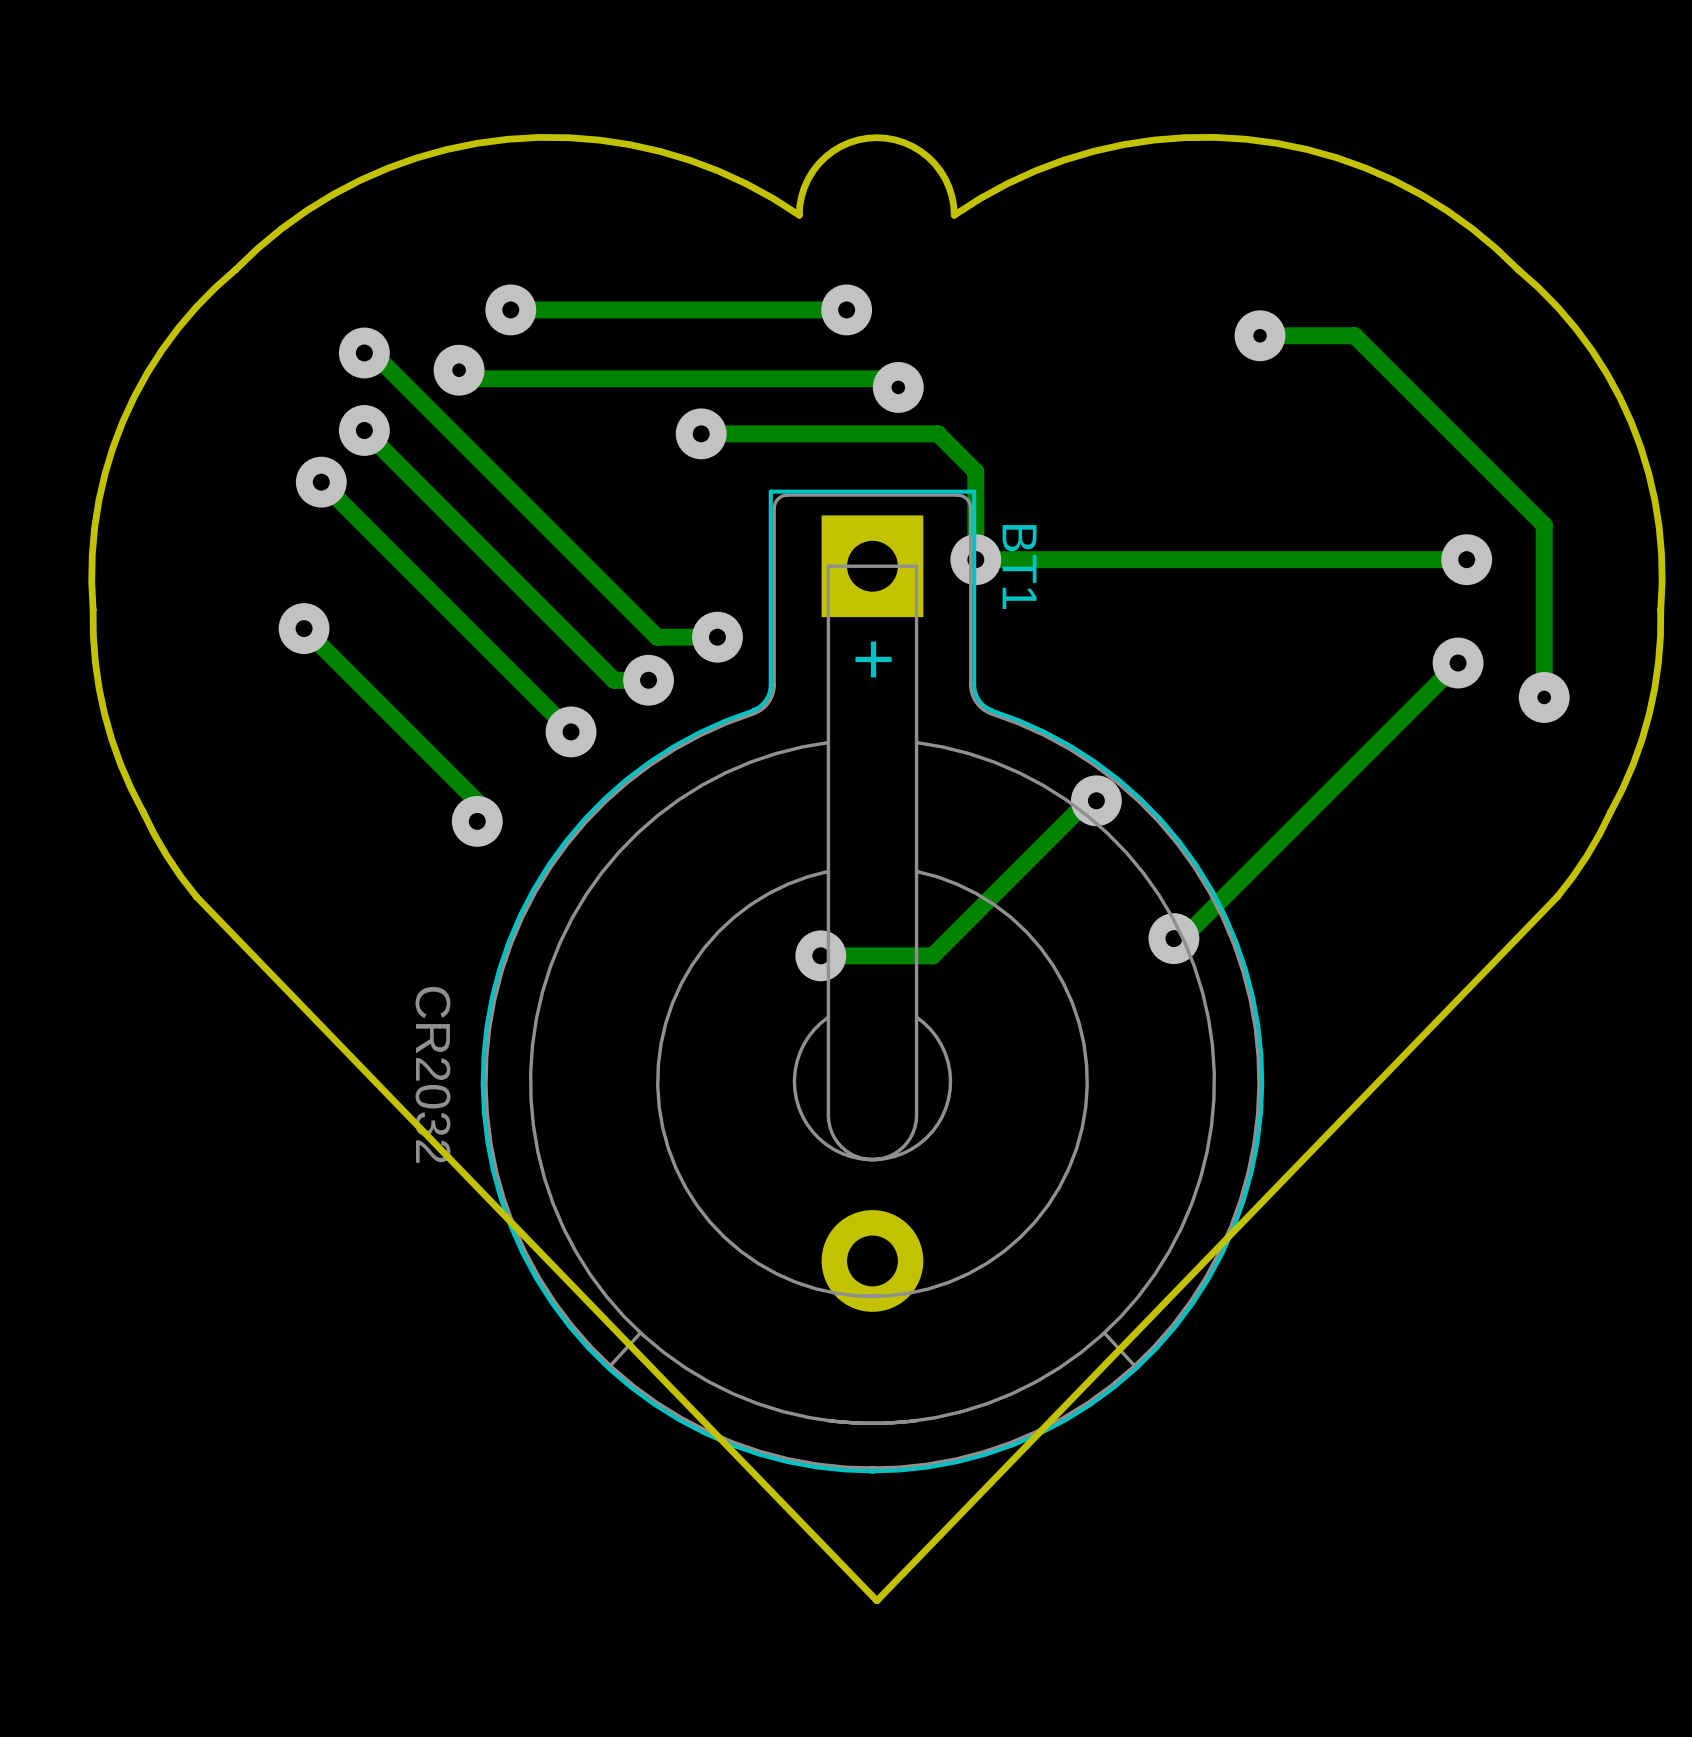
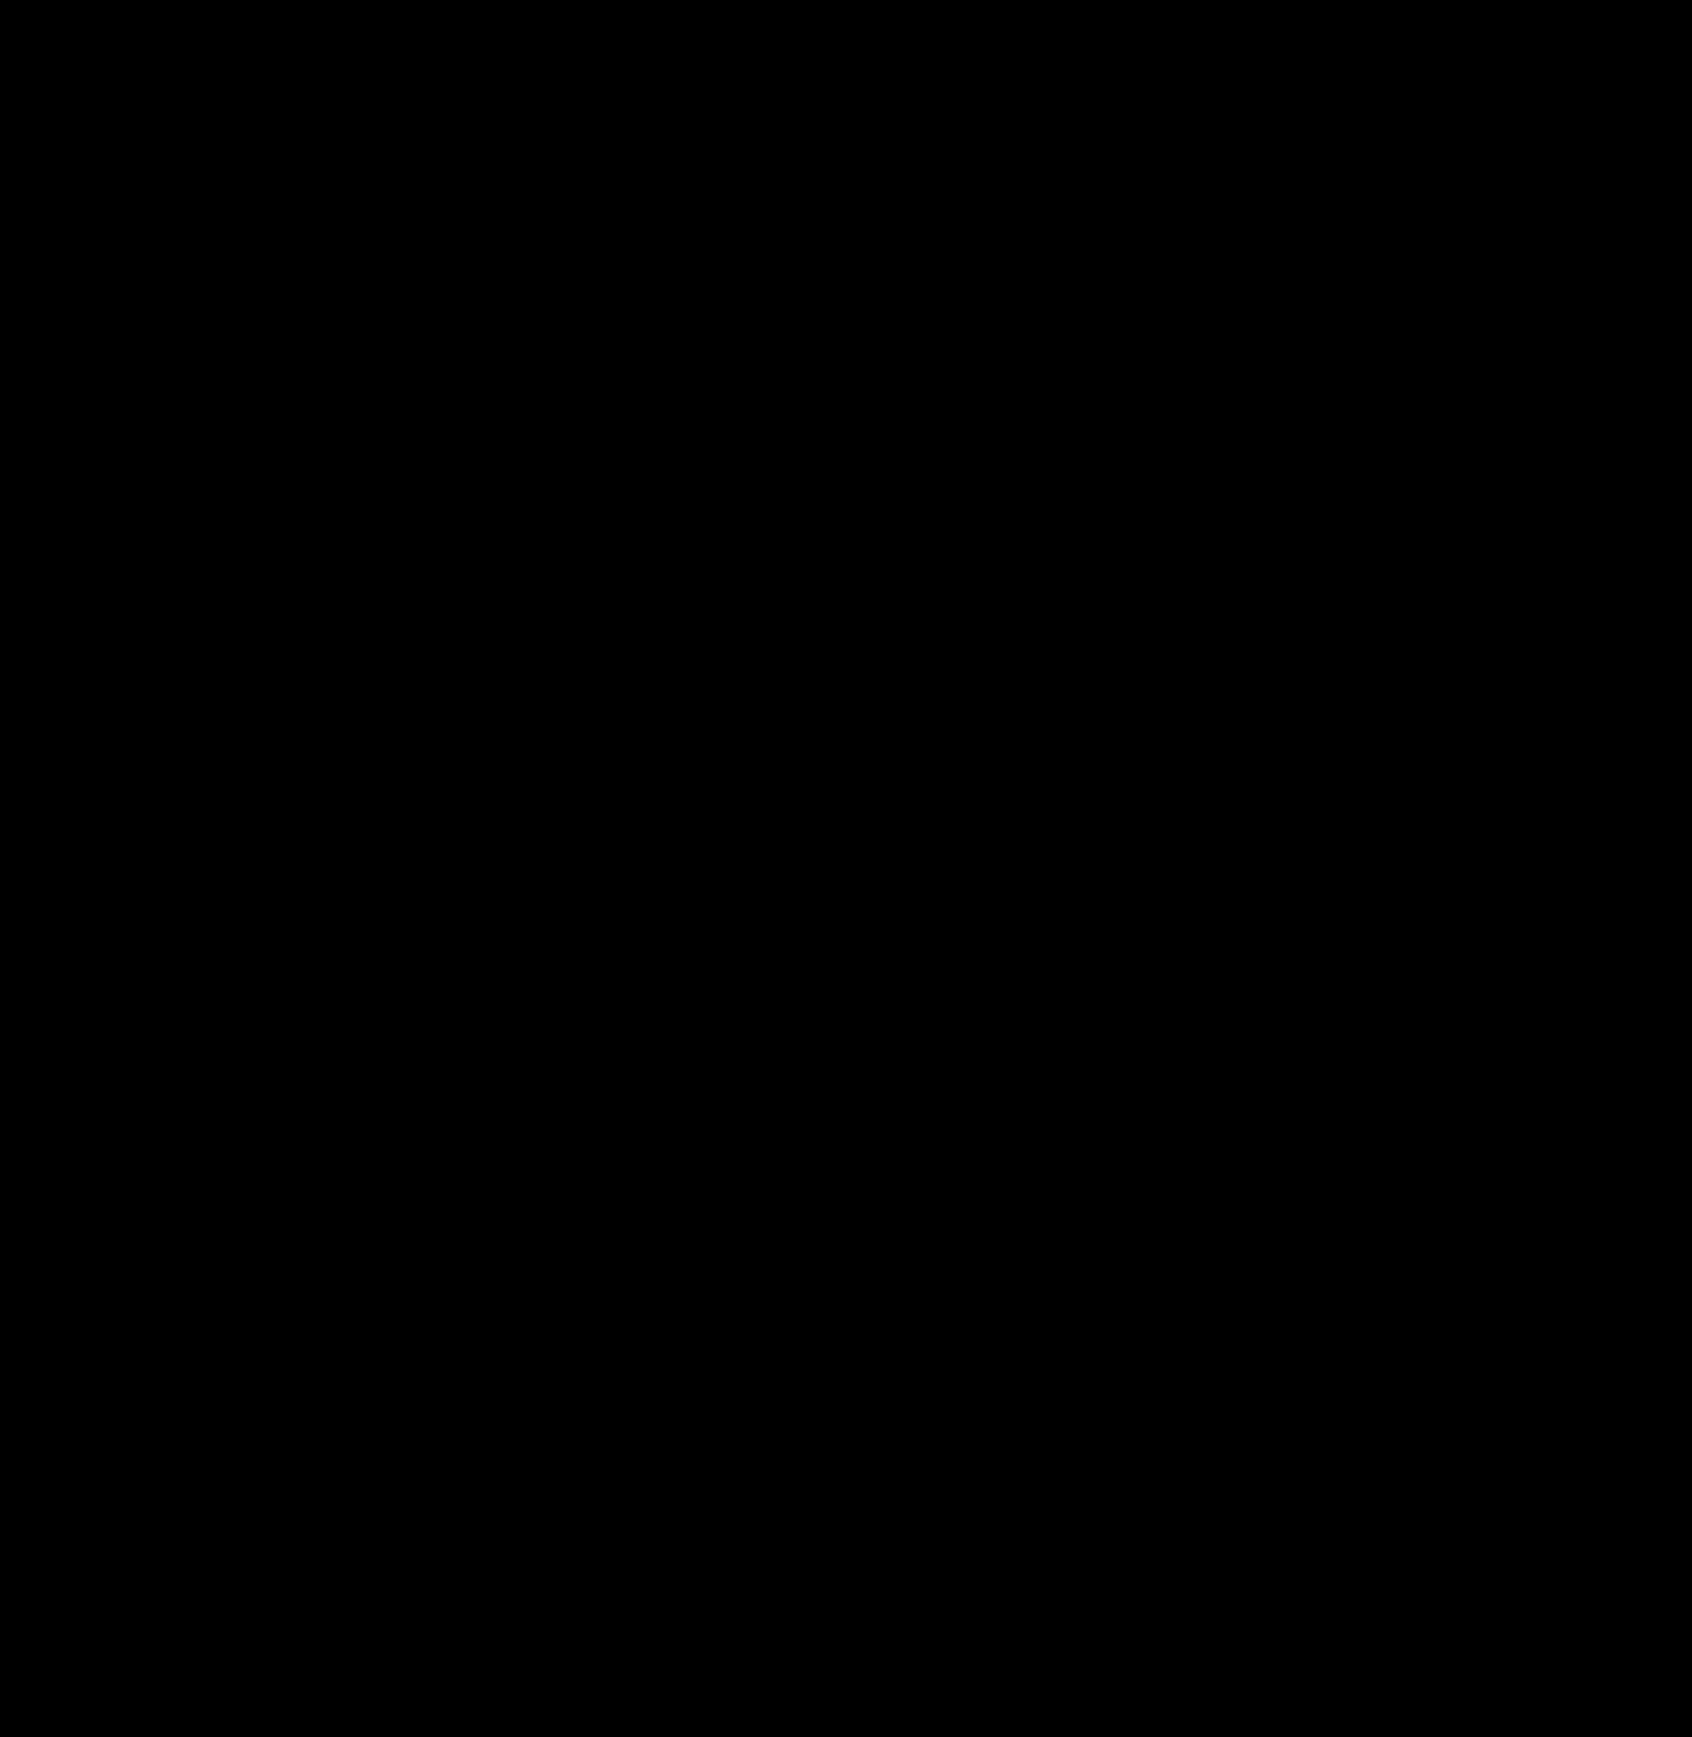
board edge: (954, 215) (949, 187) (934, 163) (912, 146) (886, 138) (867, 138) (849, 142) (825, 157) (808, 179) (801, 196) (799, 215) (773, 198) (718, 171) (660, 151) (599, 140) (538, 137) (507, 139) (446, 149) (388, 168) (332, 194) (281, 228) (215, 287) (178, 328) (147, 373) (122, 422) (105, 473) (98, 500) (92, 554) (95, 662) (104, 714) (111, 739) (131, 788) (154, 834) (180, 876) (196, 896) (876, 1600) (1557, 896) (1586, 856) (1599, 834) (1633, 764) (1649, 714) (1658, 662) (1660, 636) (1661, 554) (1654, 500) (1640, 447) (1619, 397) (1591, 350) (1575, 328) (1538, 287) (1472, 228) (1420, 194) (1365, 168) (1306, 149) (1246, 139) (1184, 137) (1123, 144) (1064, 160) (1007, 183) (954, 215) -> none
via: (510, 309) -> none
track: (846, 309) (510, 309) -> none
via: (846, 309) -> none
track: (1260, 335) (1354, 335) (1544, 525) (1544, 697) -> none
via: (1260, 335) -> none
track: (364, 352) (372, 352) (657, 637) (717, 637) -> none
via: (364, 352) -> none
track: (459, 370) (467, 378) (889, 378) (898, 387) -> none
via: (459, 370) -> none
via: (898, 387) -> none
track: (364, 430) (614, 680) (648, 680) -> none
via: (364, 430) -> none
track: (701, 433) (938, 433) (975, 471) (975, 559) (1466, 559) -> none
via: (701, 433) -> none
track: (321, 482) (571, 731) -> none
via: (321, 482) -> none
via: (975, 559) -> none
via: (1466, 559) -> none
track: (304, 628) (477, 801) (477, 821) -> none
via: (304, 628) -> none
via: (717, 637) -> none
track: (1458, 663) (1182, 938) (1173, 938) -> none
via: (1458, 663) -> none
via: (648, 680) -> none
via: (1544, 697) -> none
via: (571, 731) -> none
track: (1096, 800) (1087, 800) (932, 955) (820, 955) -> none
via: (1096, 800) -> none
via: (477, 821) -> none
via: (1173, 938) -> none
via: (820, 955) -> none
BT1: CR2032 (872, 981) -> none

